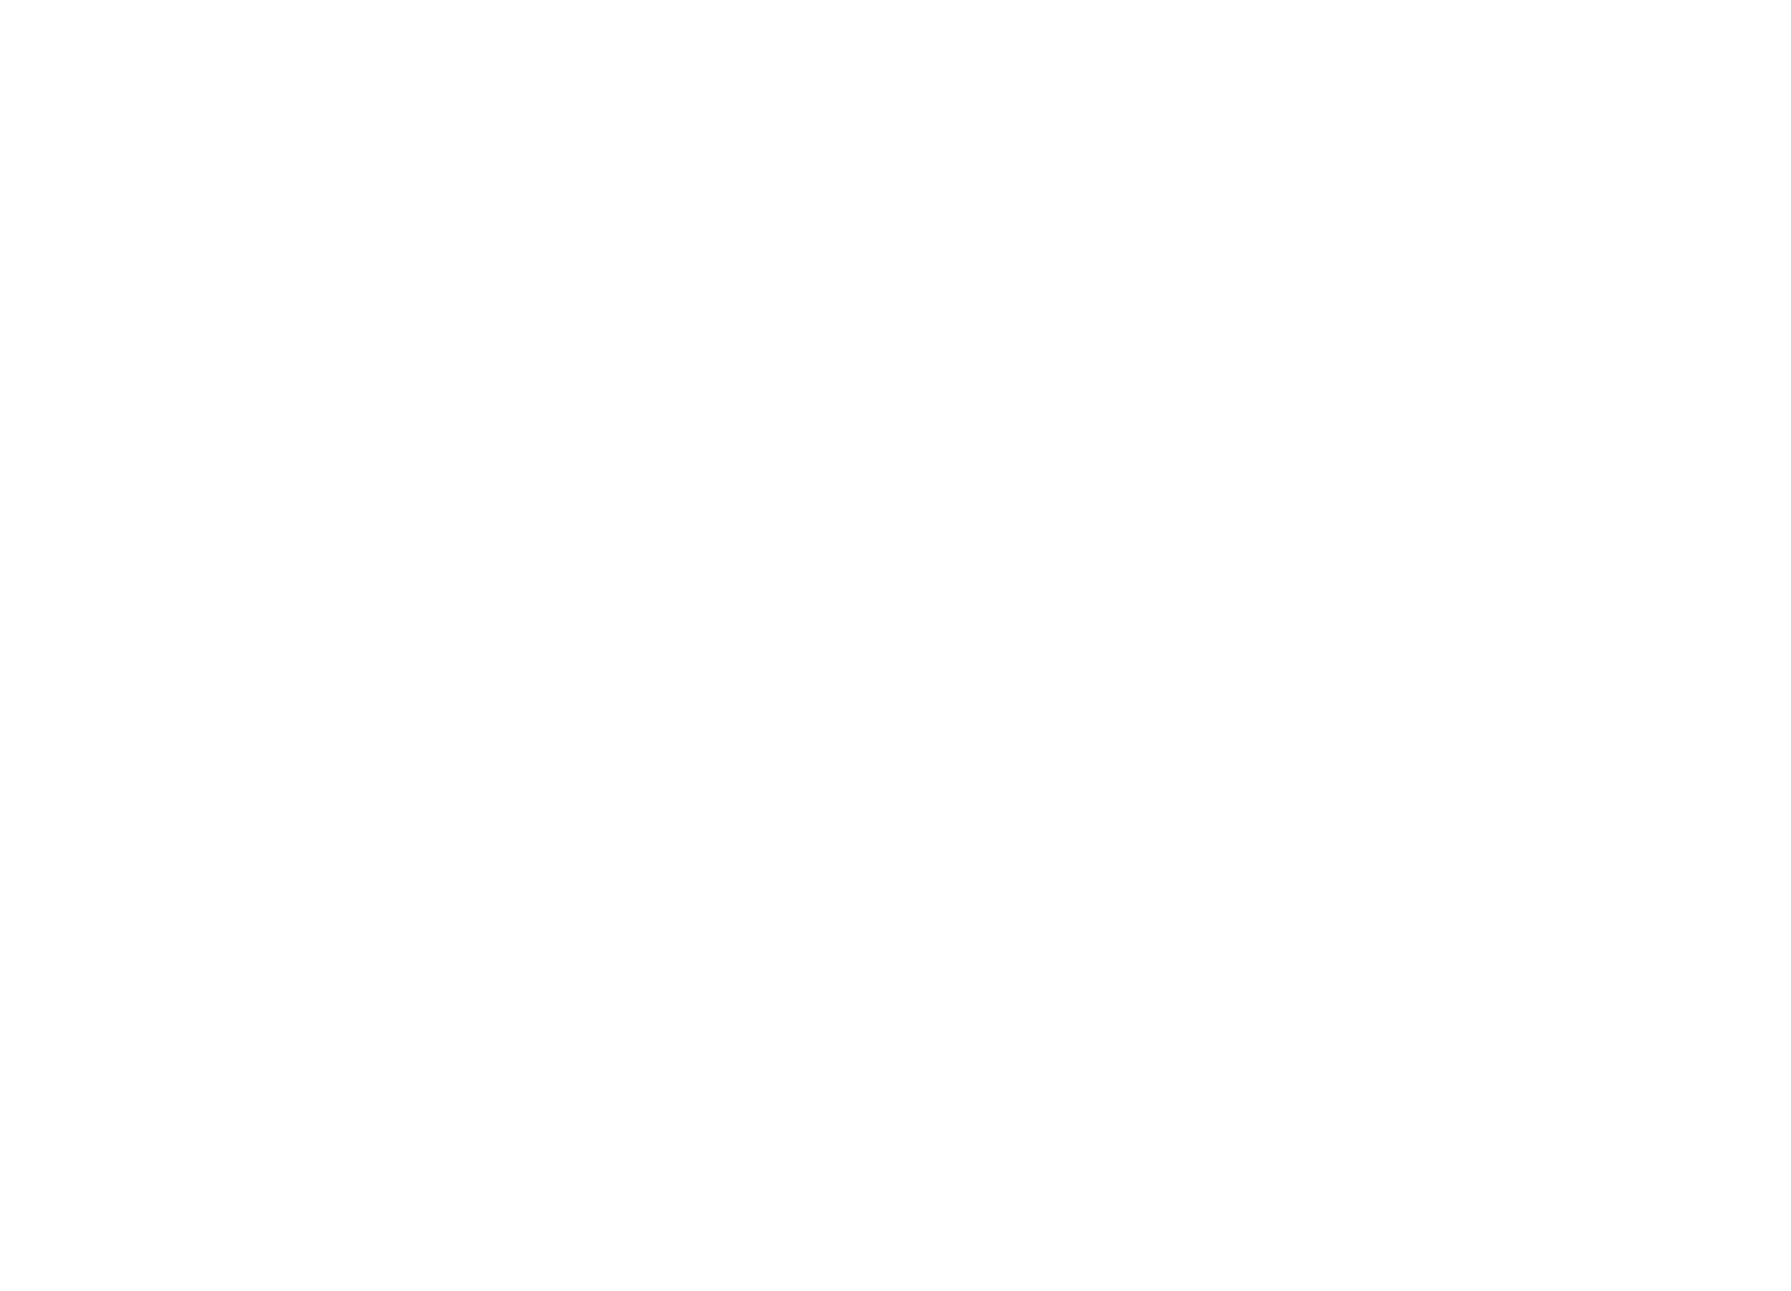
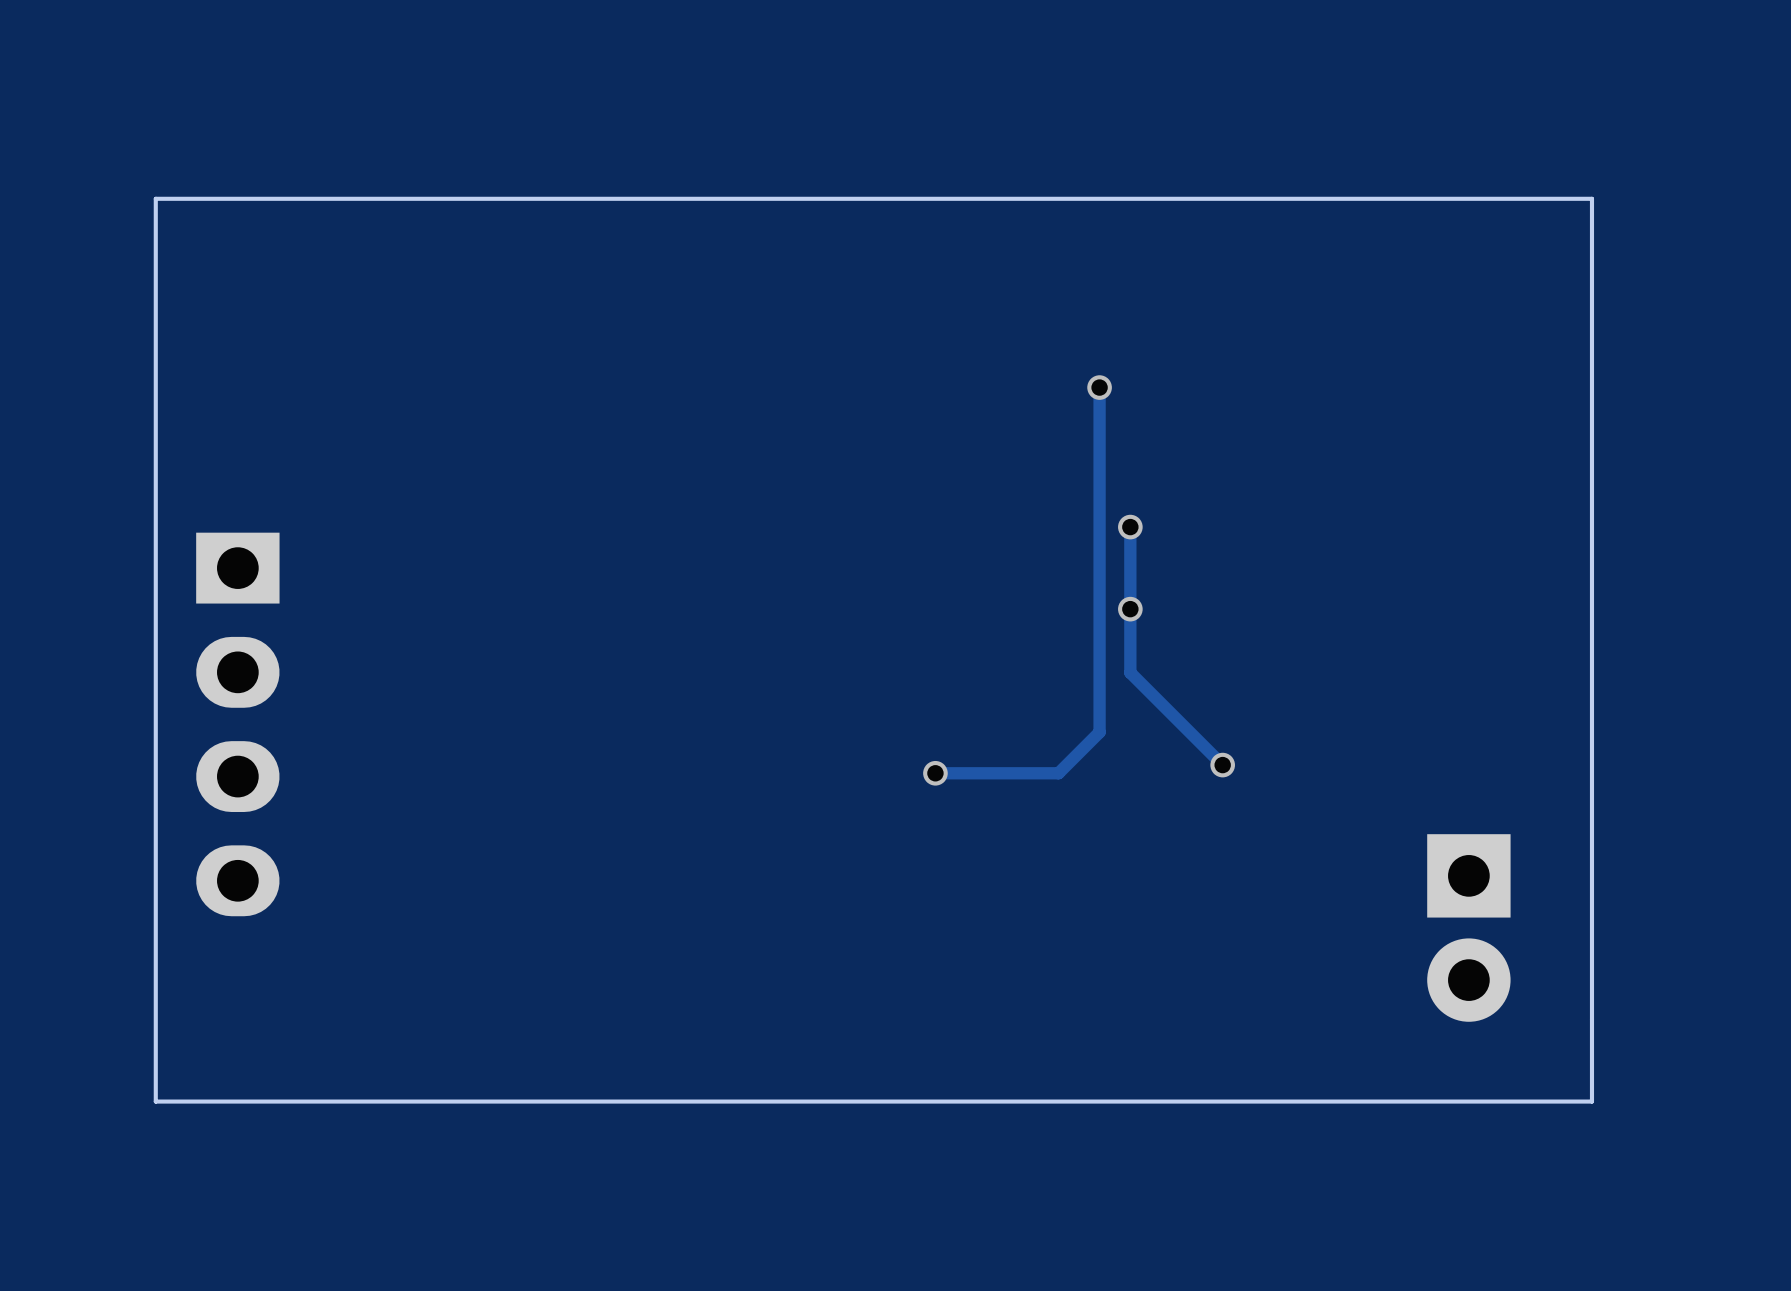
board edge: none -> (1591, 198) (1591, 1101) (155, 1101) (155, 198) (1591, 198)
track: none -> (1099, 387) (1099, 732) (1058, 773) (935, 773)
via: none -> (1099, 387)
track: none -> (1130, 527) (1130, 672) (1222, 765)
via: none -> (1130, 527)
via: none -> (1130, 609)
part: none -> (237, 724)
via: none -> (1222, 765)
via: none -> (935, 773)
part: none -> (1468, 927)

